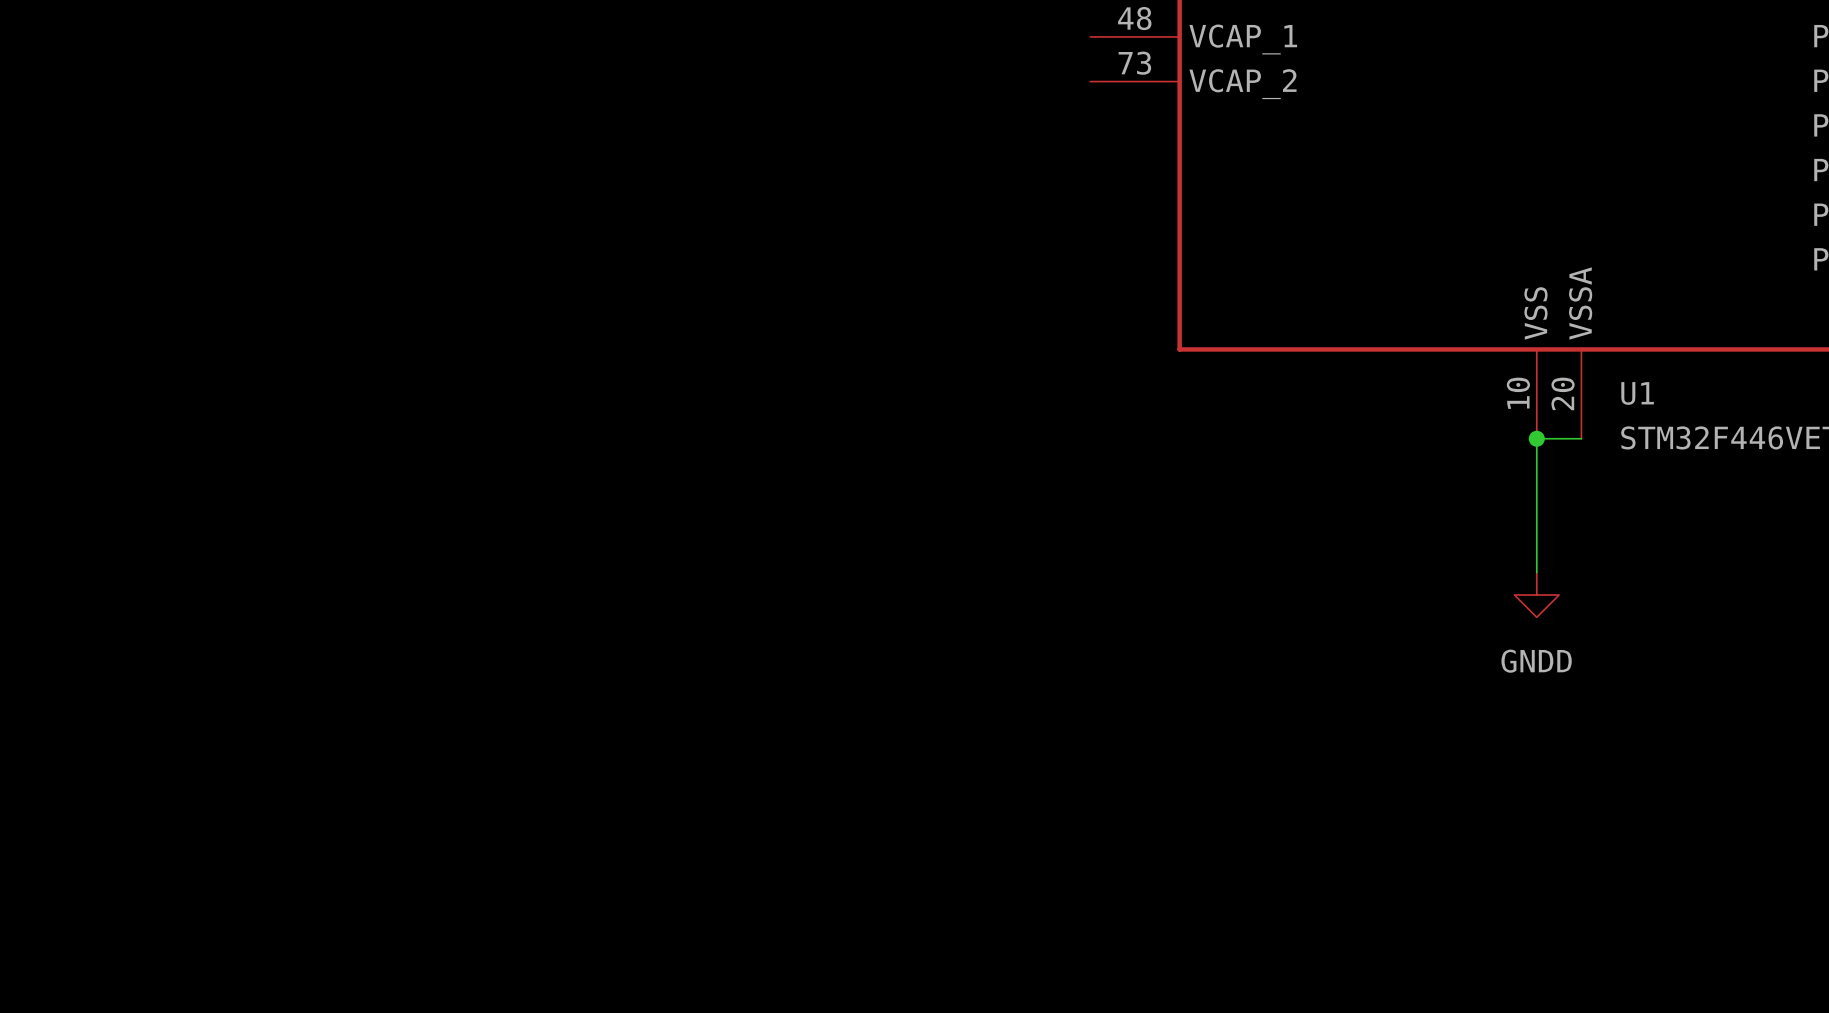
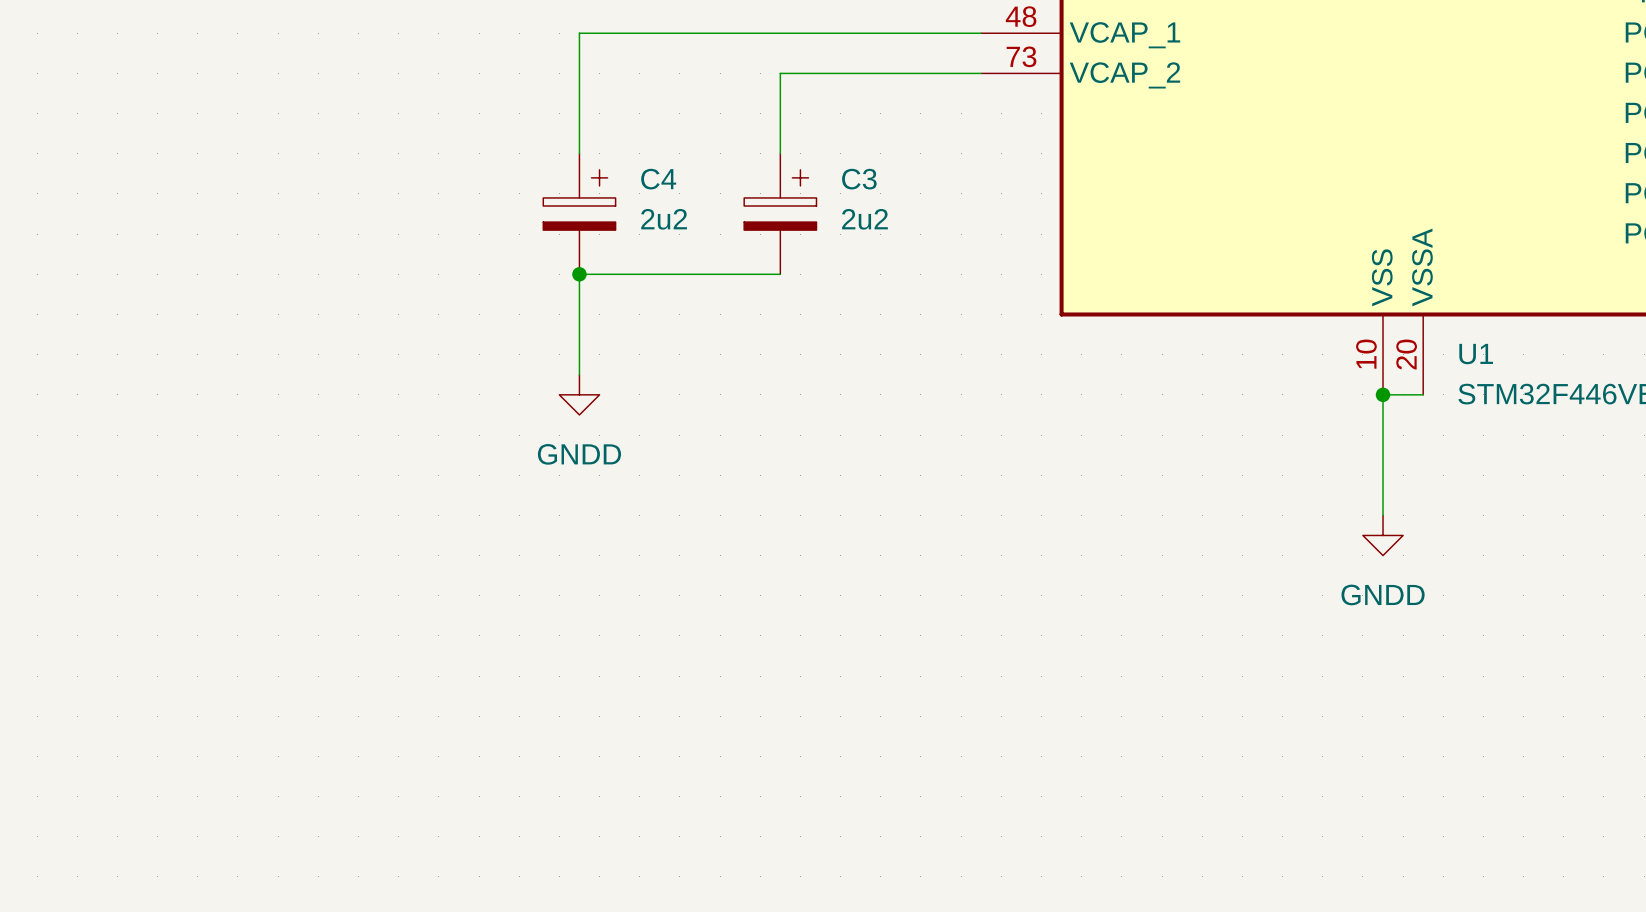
wire: none -> (981, 33) (579, 33) (579, 153)
wire: none -> (981, 73) (780, 73) (780, 153)
C4: none -> 2u2 (579, 214)
C3: none -> 2u2 (780, 214)
junction: none -> (579, 274)
wire: none -> (780, 274) (579, 274) (579, 374)
power symbol: none -> GNDD (579, 394)

